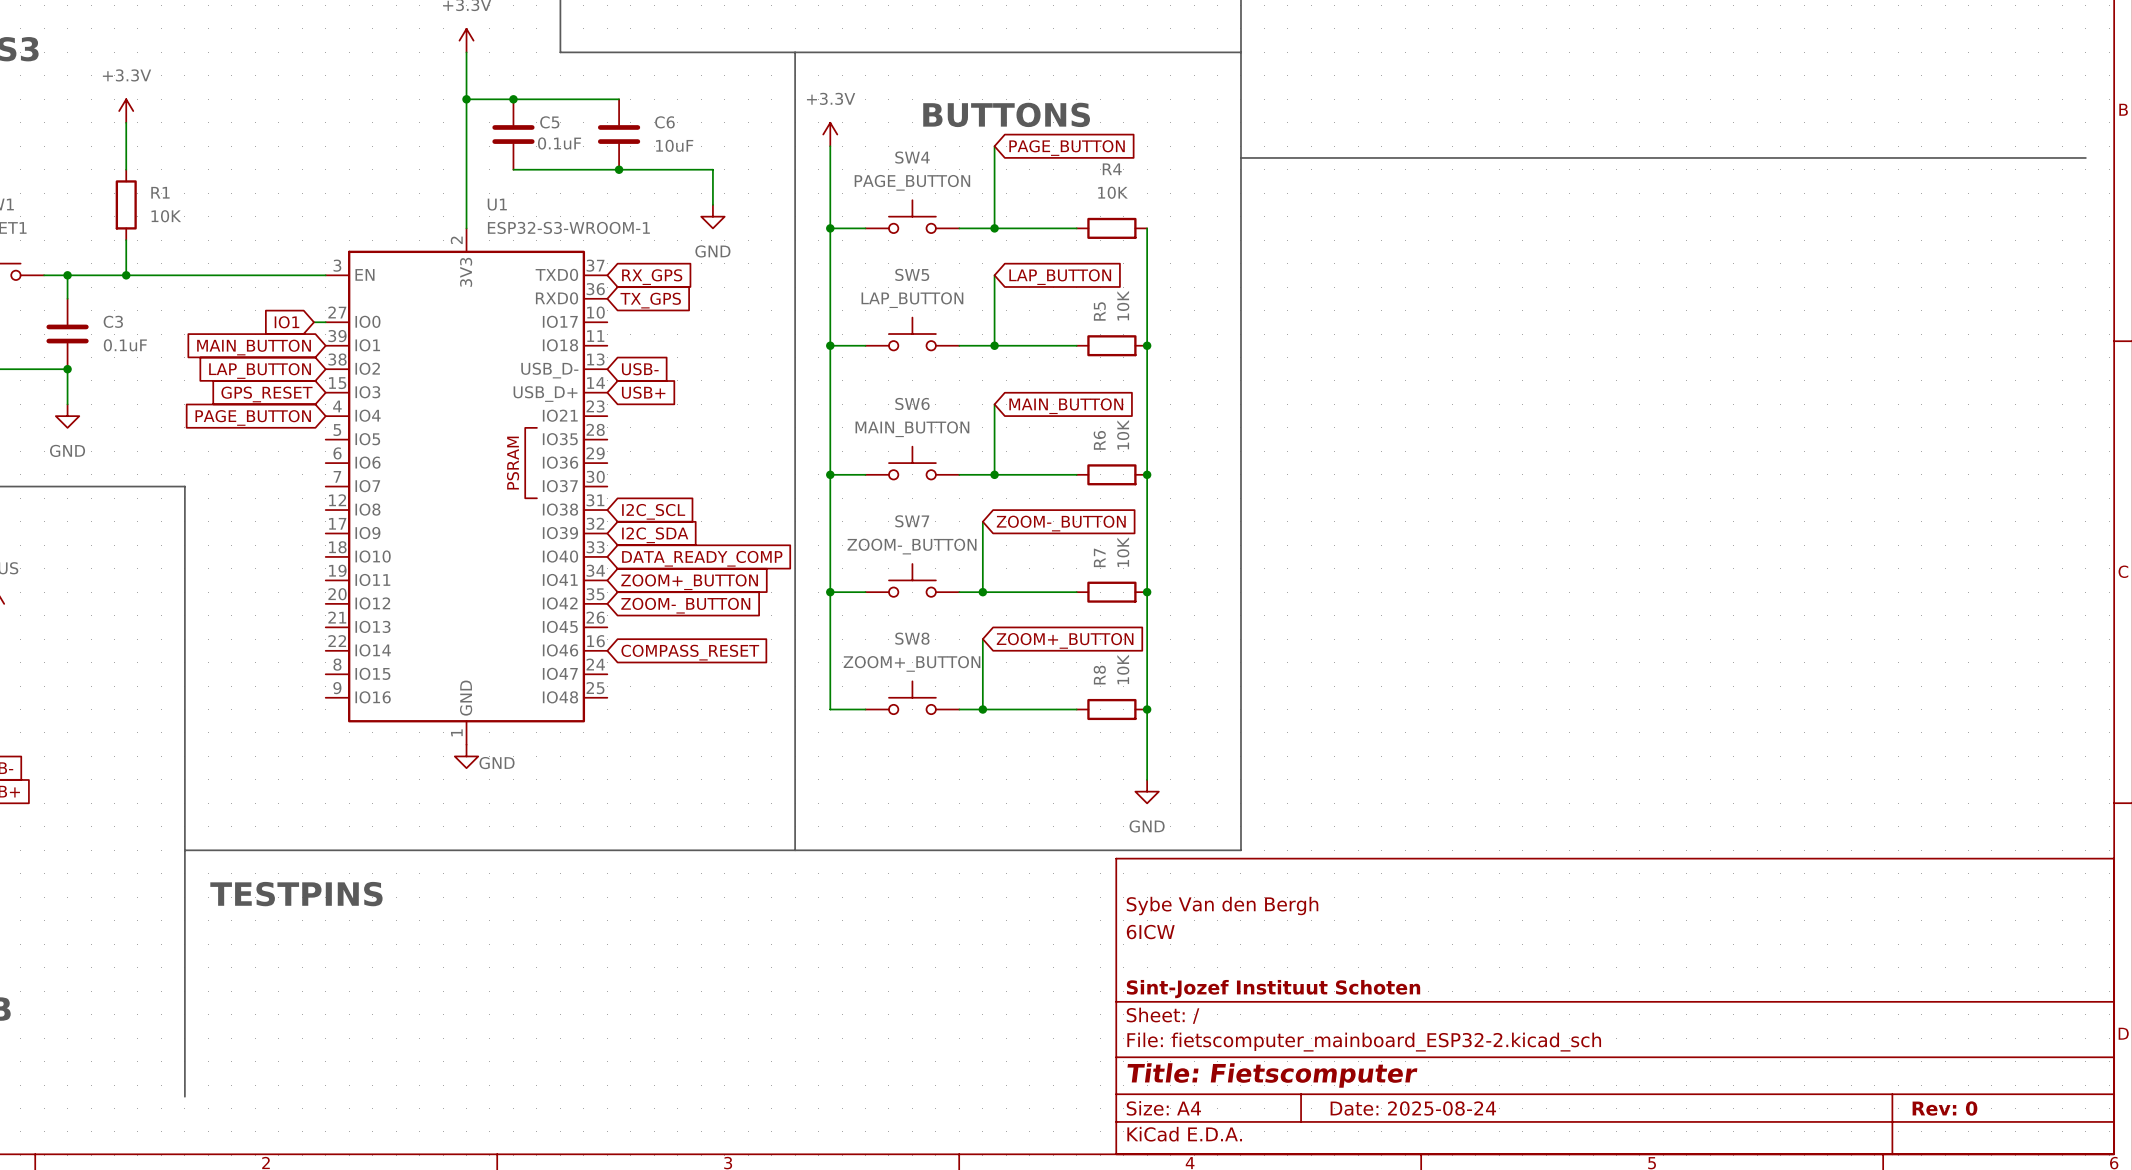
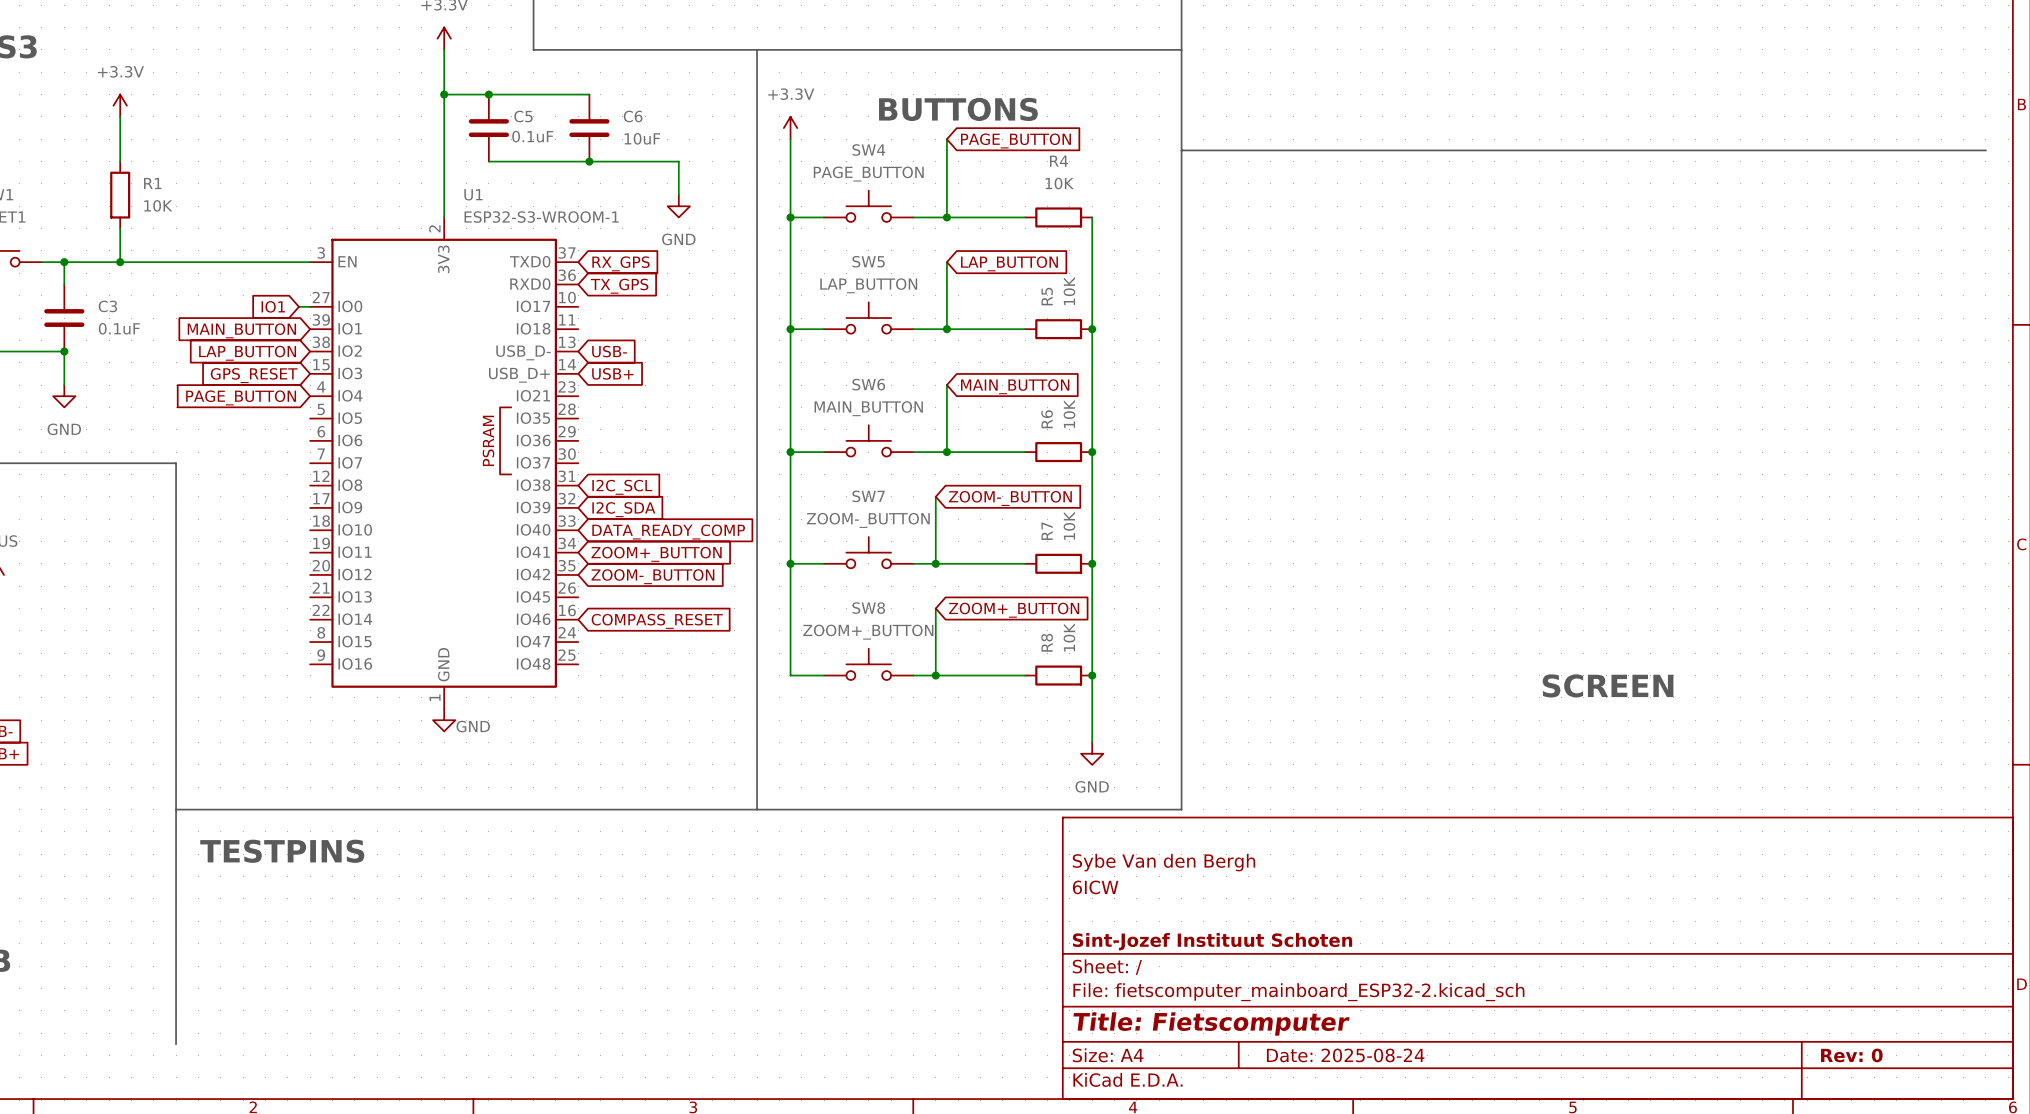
text: none -> SCREEN (1608, 685)

